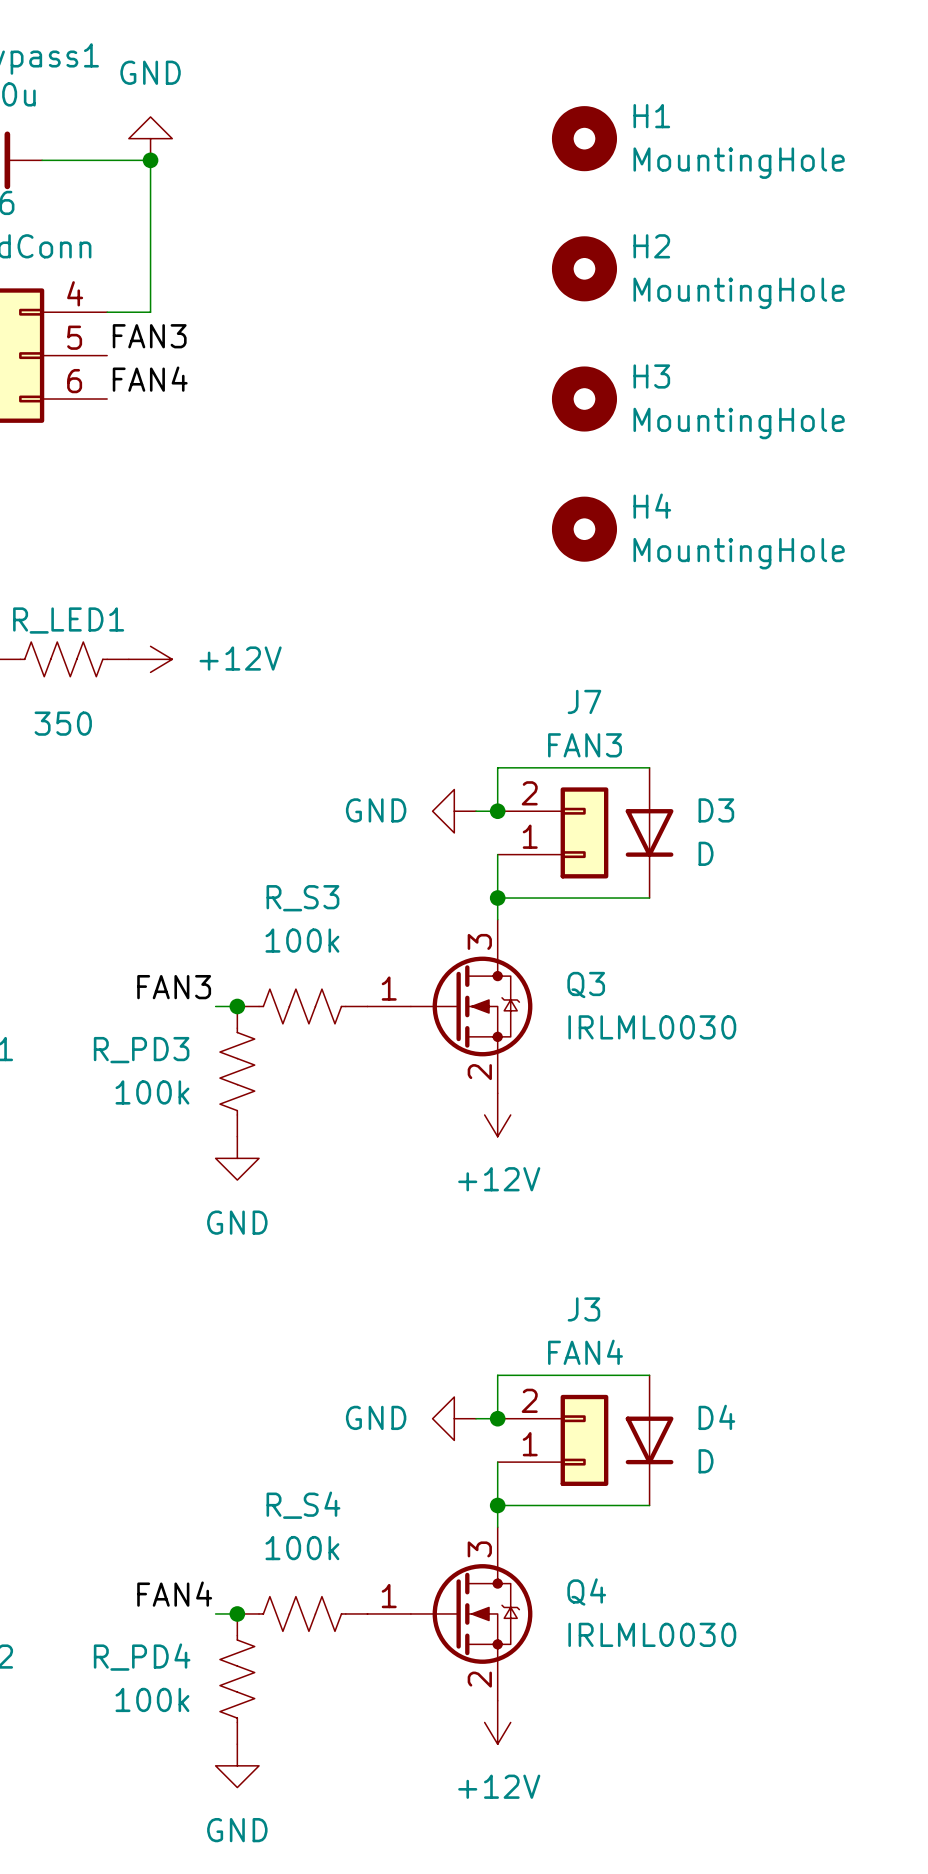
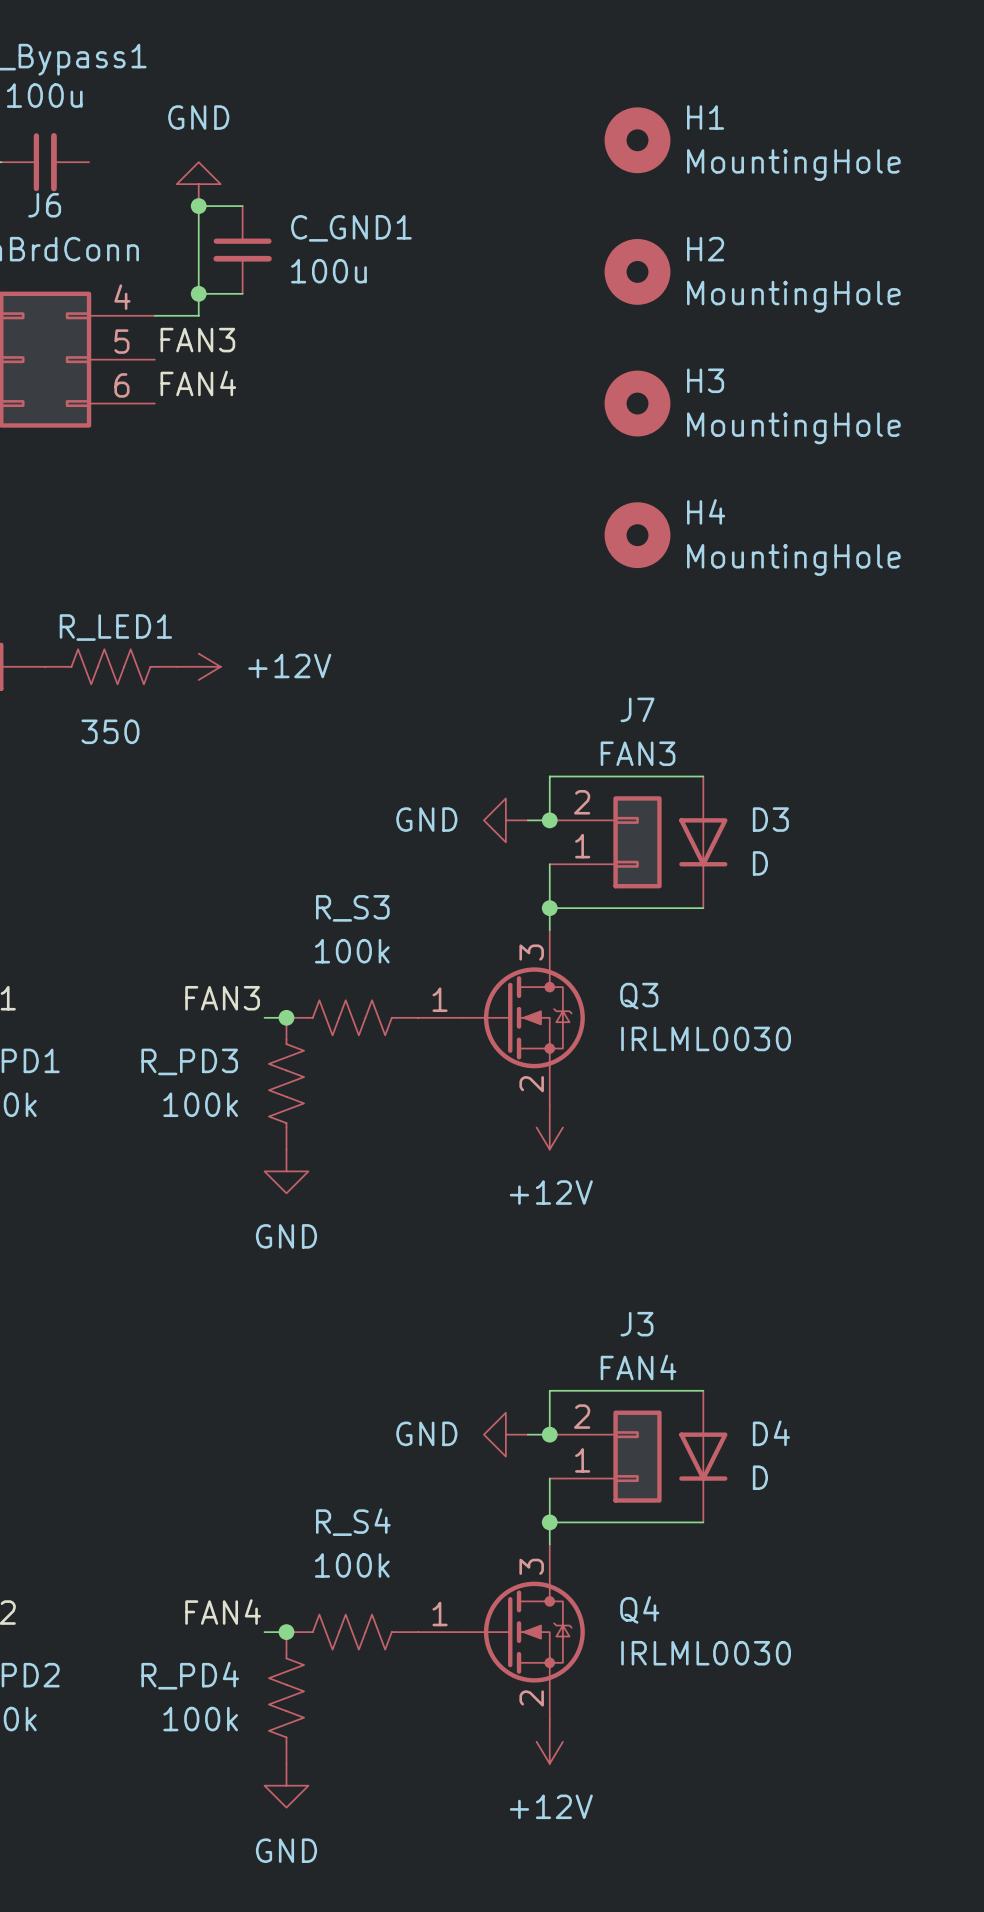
power symbol position: GND (150, 138) -> GND (198, 184)
wire: (42, 160) (150, 160) (150, 203) -> (242, 206) (198, 206)
junction position: (150, 160) -> (198, 206)
C_GND1: none -> 100u (242, 249)
wire: none -> (198, 293) (242, 293)
junction: none -> (198, 293)

